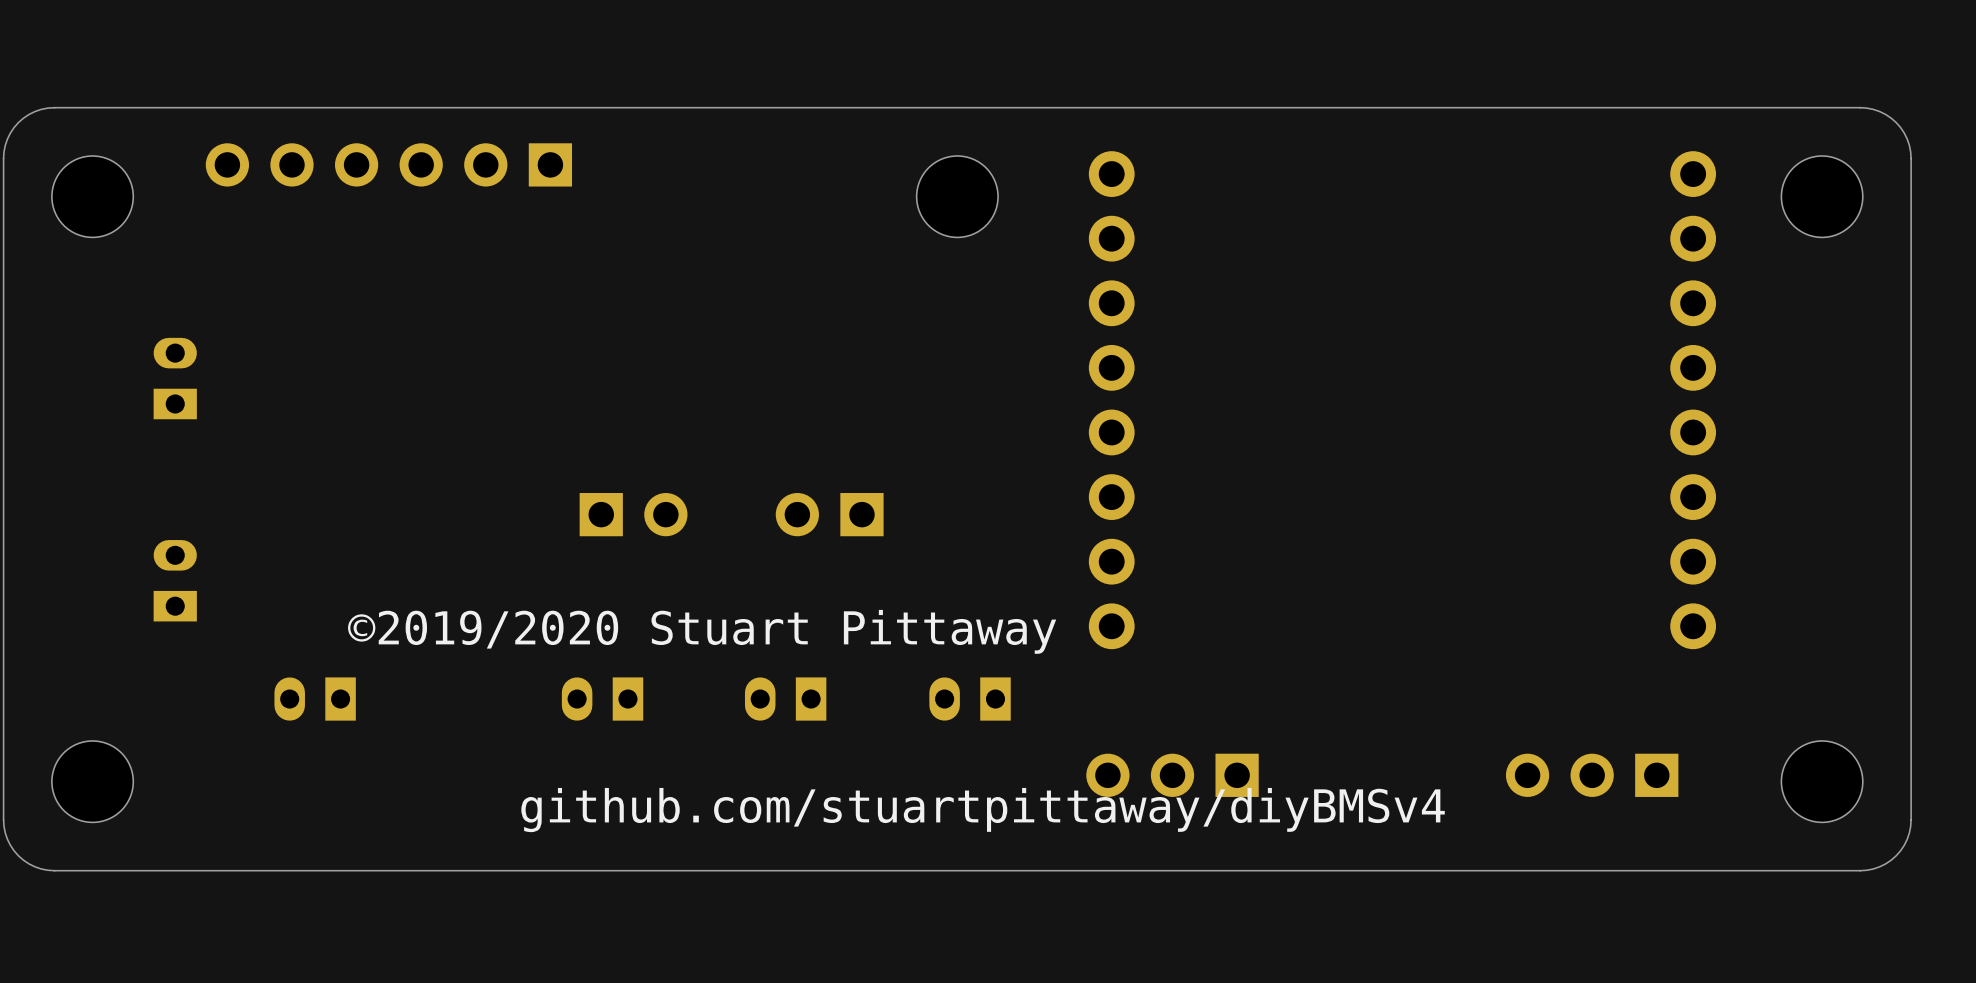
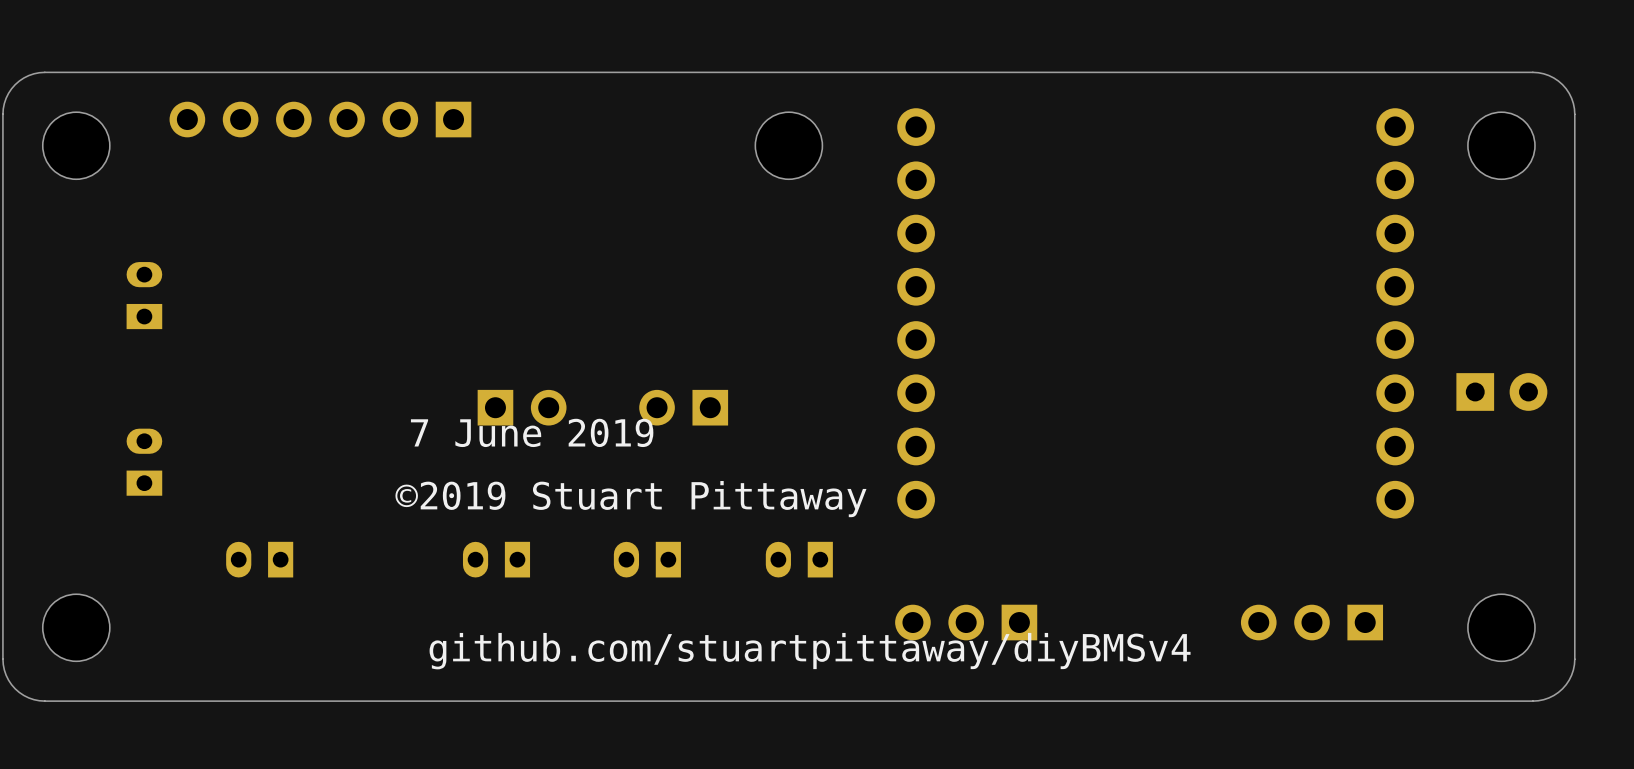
part: none -> (1501, 391)
text: none -> 7 June 2019 (532, 432)
text: ©2019/2020 Stuart Pittaway (702, 631) -> ©2019 Stuart Pittaway (630, 499)

